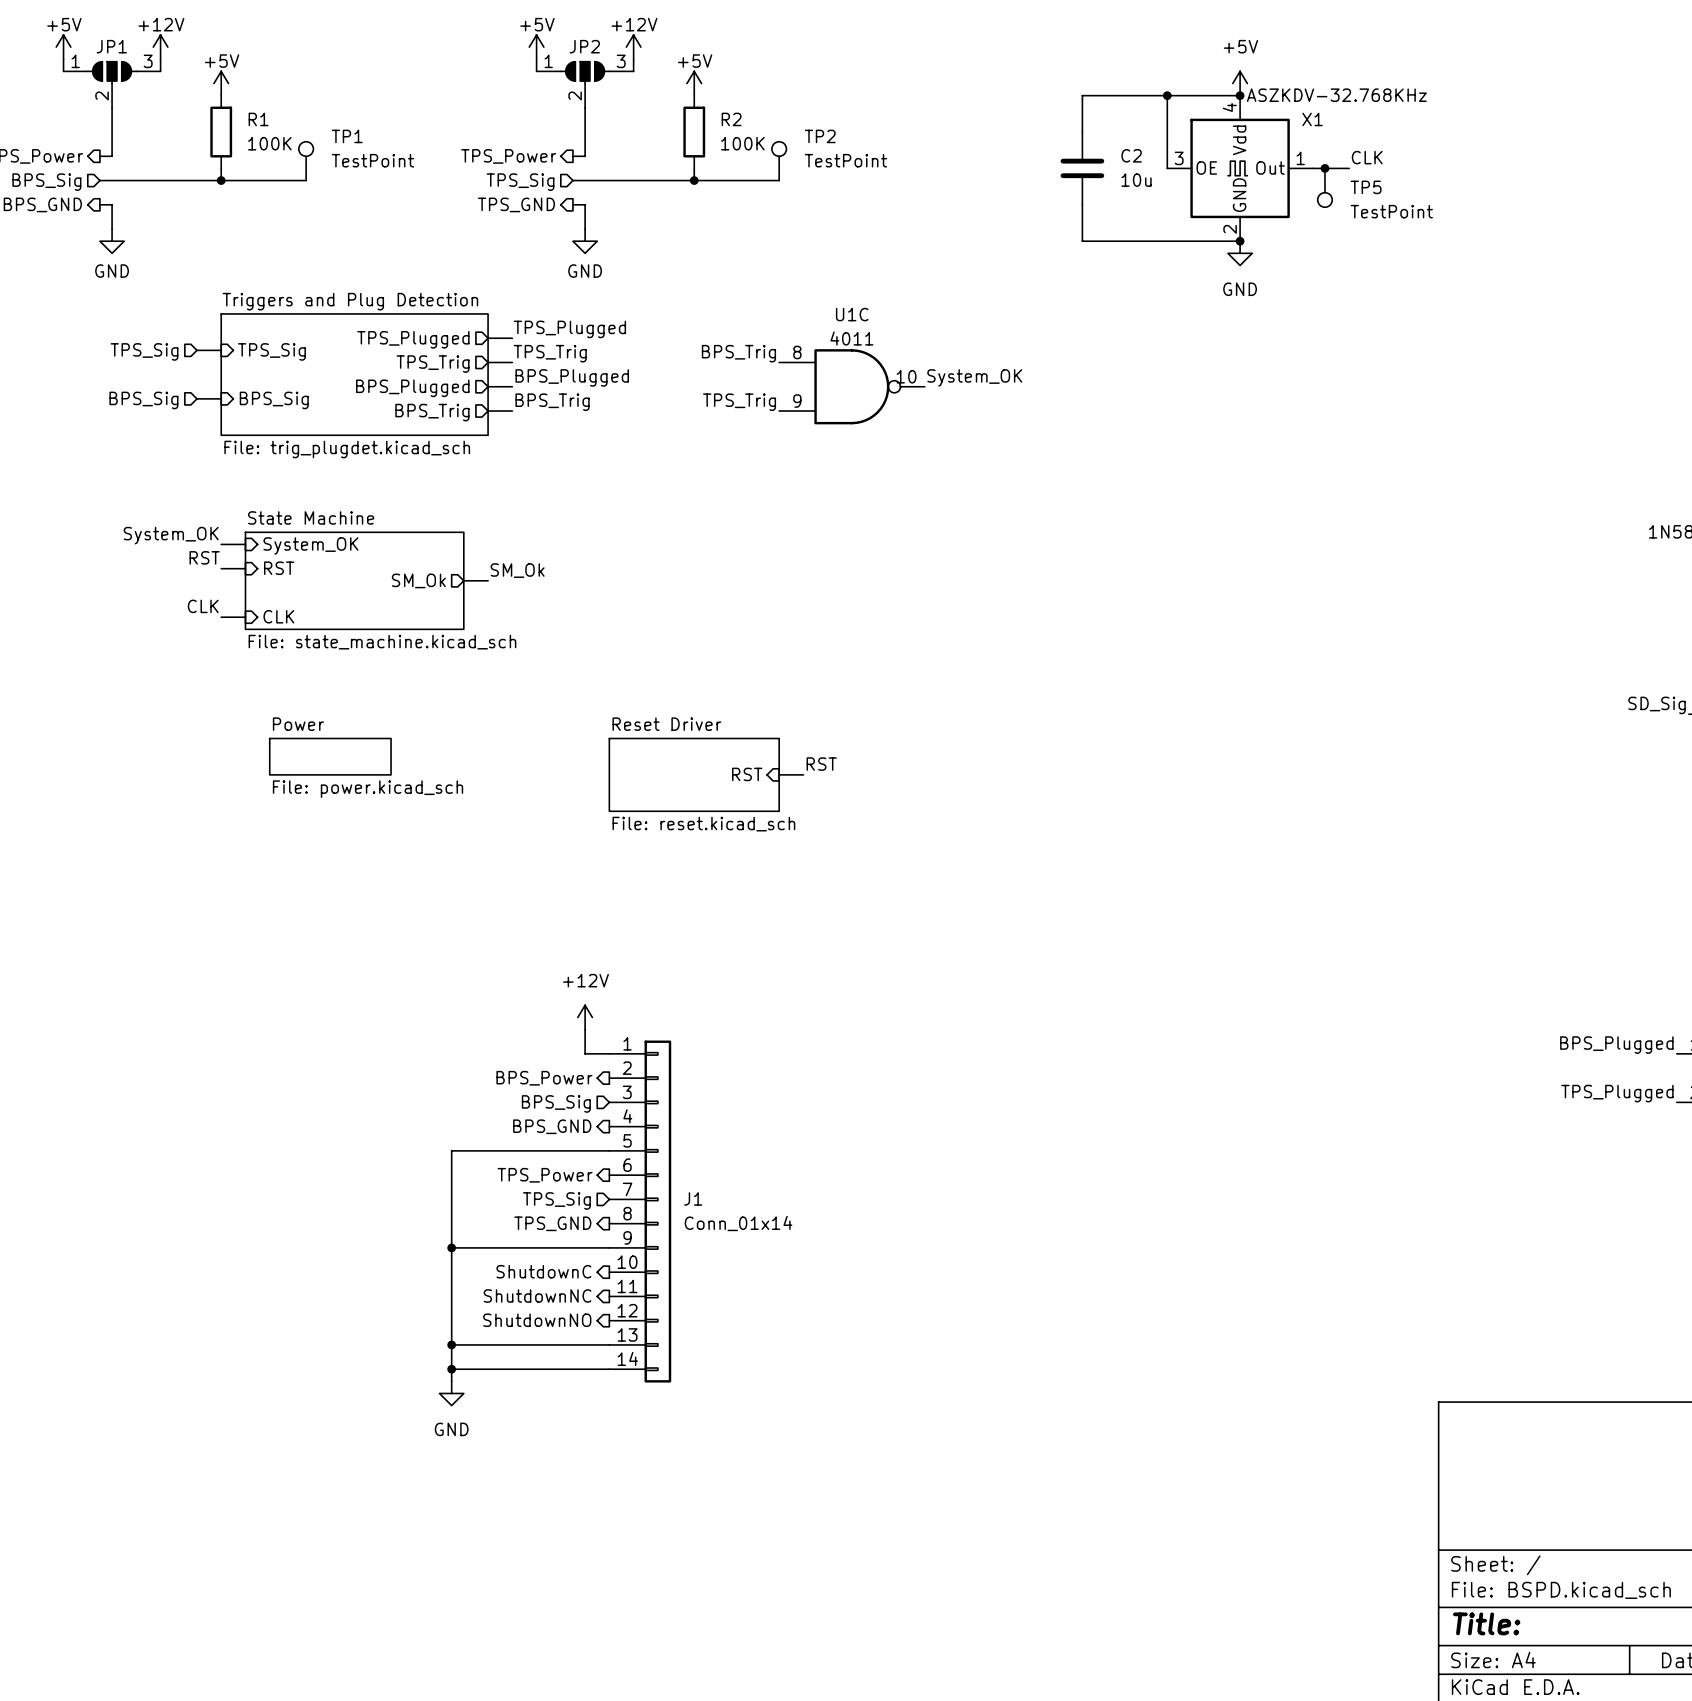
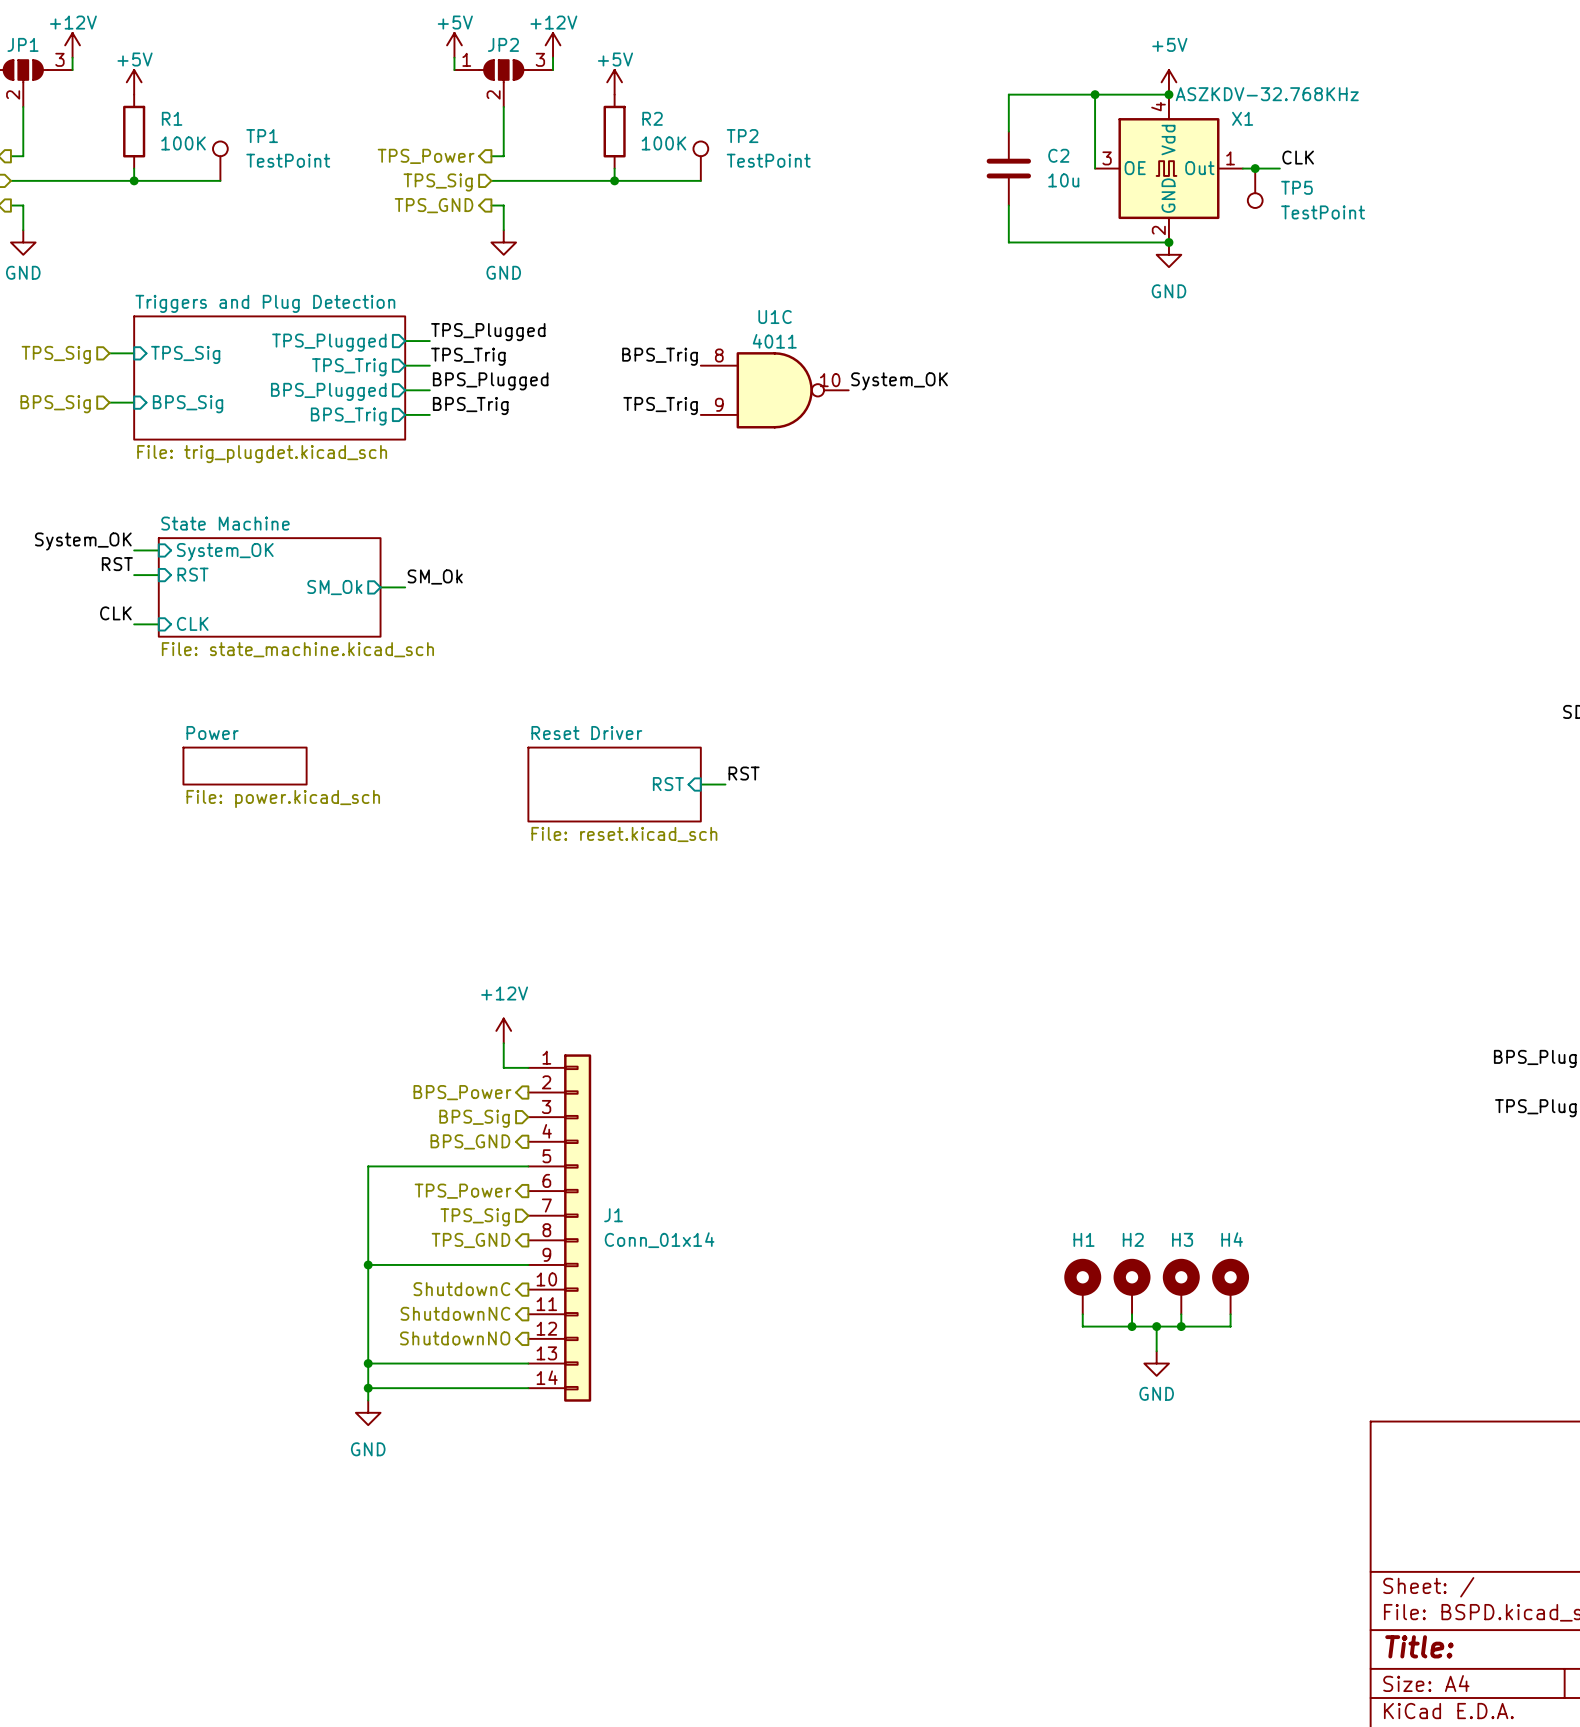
H1: none -> (1082, 1286)
H2: none -> (1132, 1286)
H3: none -> (1181, 1286)
H4: none -> (1230, 1286)
wire: none -> (1082, 1314) (1082, 1326) (1230, 1326) (1230, 1314)
wire: none -> (1132, 1314) (1132, 1326)
wire: none -> (1181, 1314) (1181, 1326)
junction: none -> (1132, 1326)
wire: none -> (1156, 1326) (1156, 1351)
junction: none -> (1156, 1326)
junction: none -> (1181, 1326)
power symbol: none -> GND (1156, 1363)

